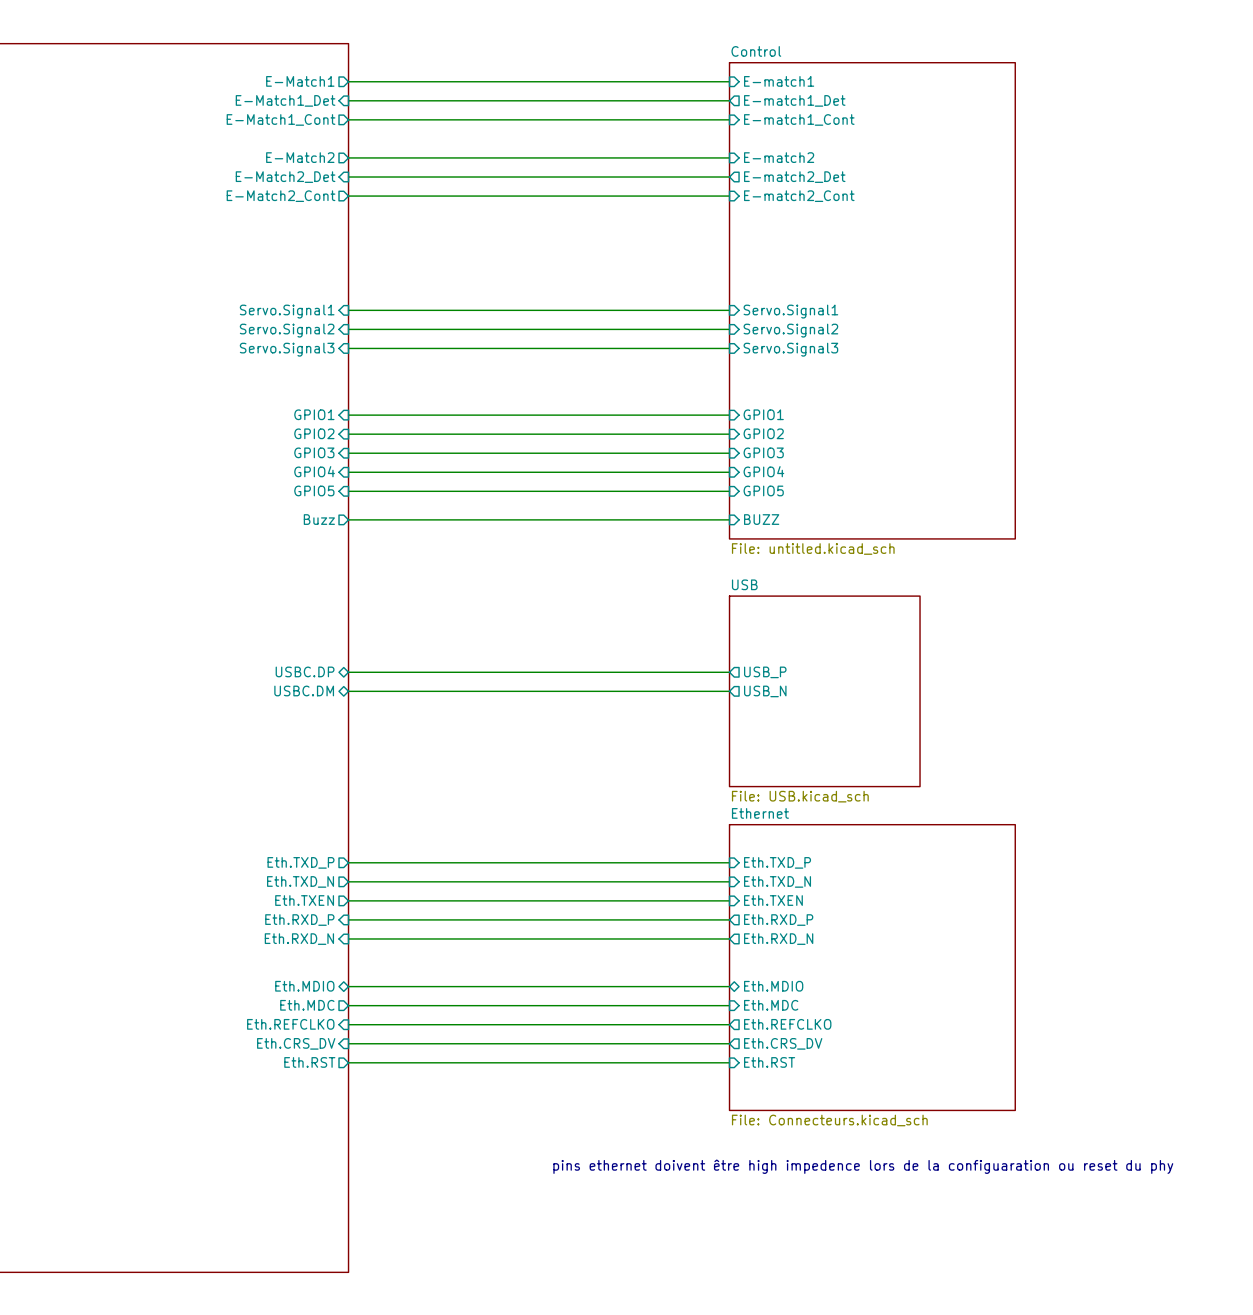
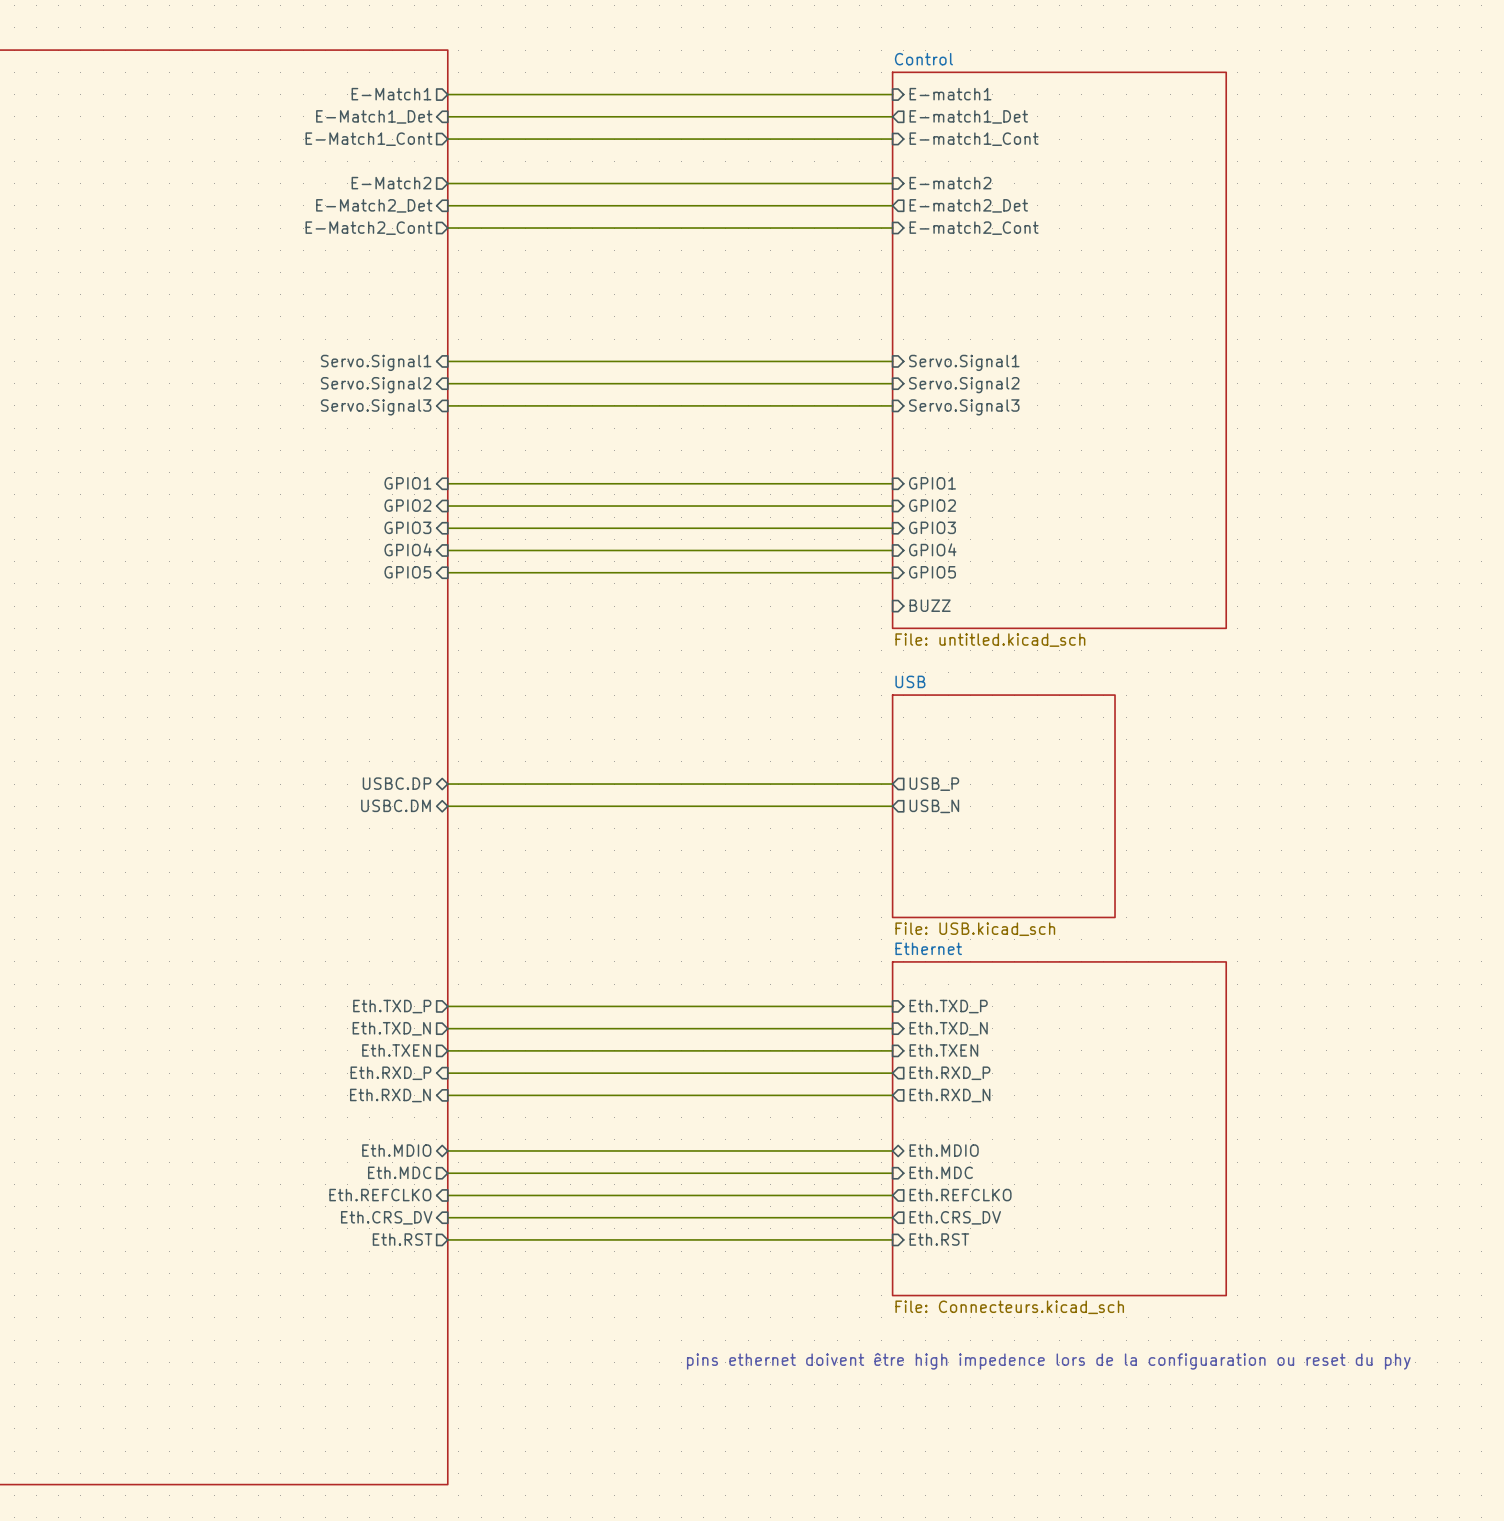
sheet pin: Buzz (319, 519) -> none
wire: (348, 519) (729, 519) -> none

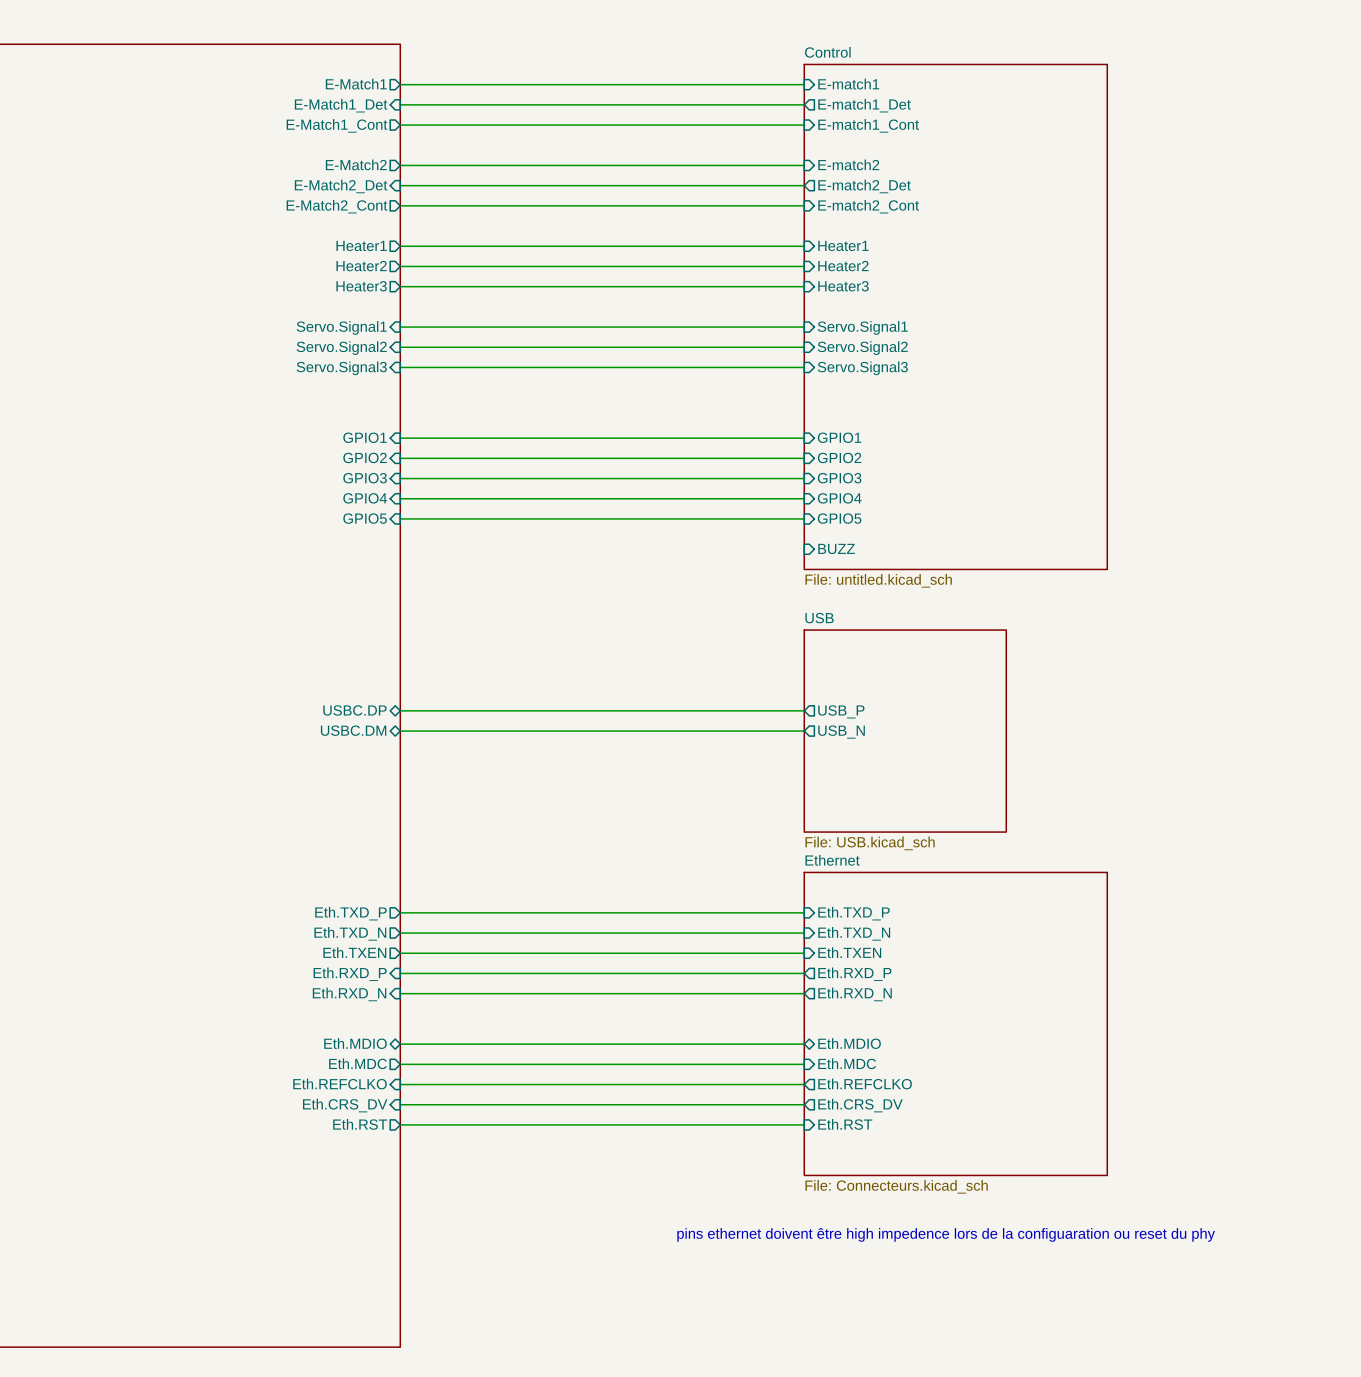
sheet pin: none -> Heater1 (361, 245)
wire: none -> (400, 246) (804, 246)
sheet pin: none -> Heater1 (843, 245)
sheet pin: none -> Heater2 (361, 266)
wire: none -> (400, 266) (804, 266)
sheet pin: none -> Heater2 (843, 266)
sheet pin: none -> Heater3 (361, 286)
wire: none -> (400, 286) (804, 286)
sheet pin: none -> Heater3 (843, 286)

